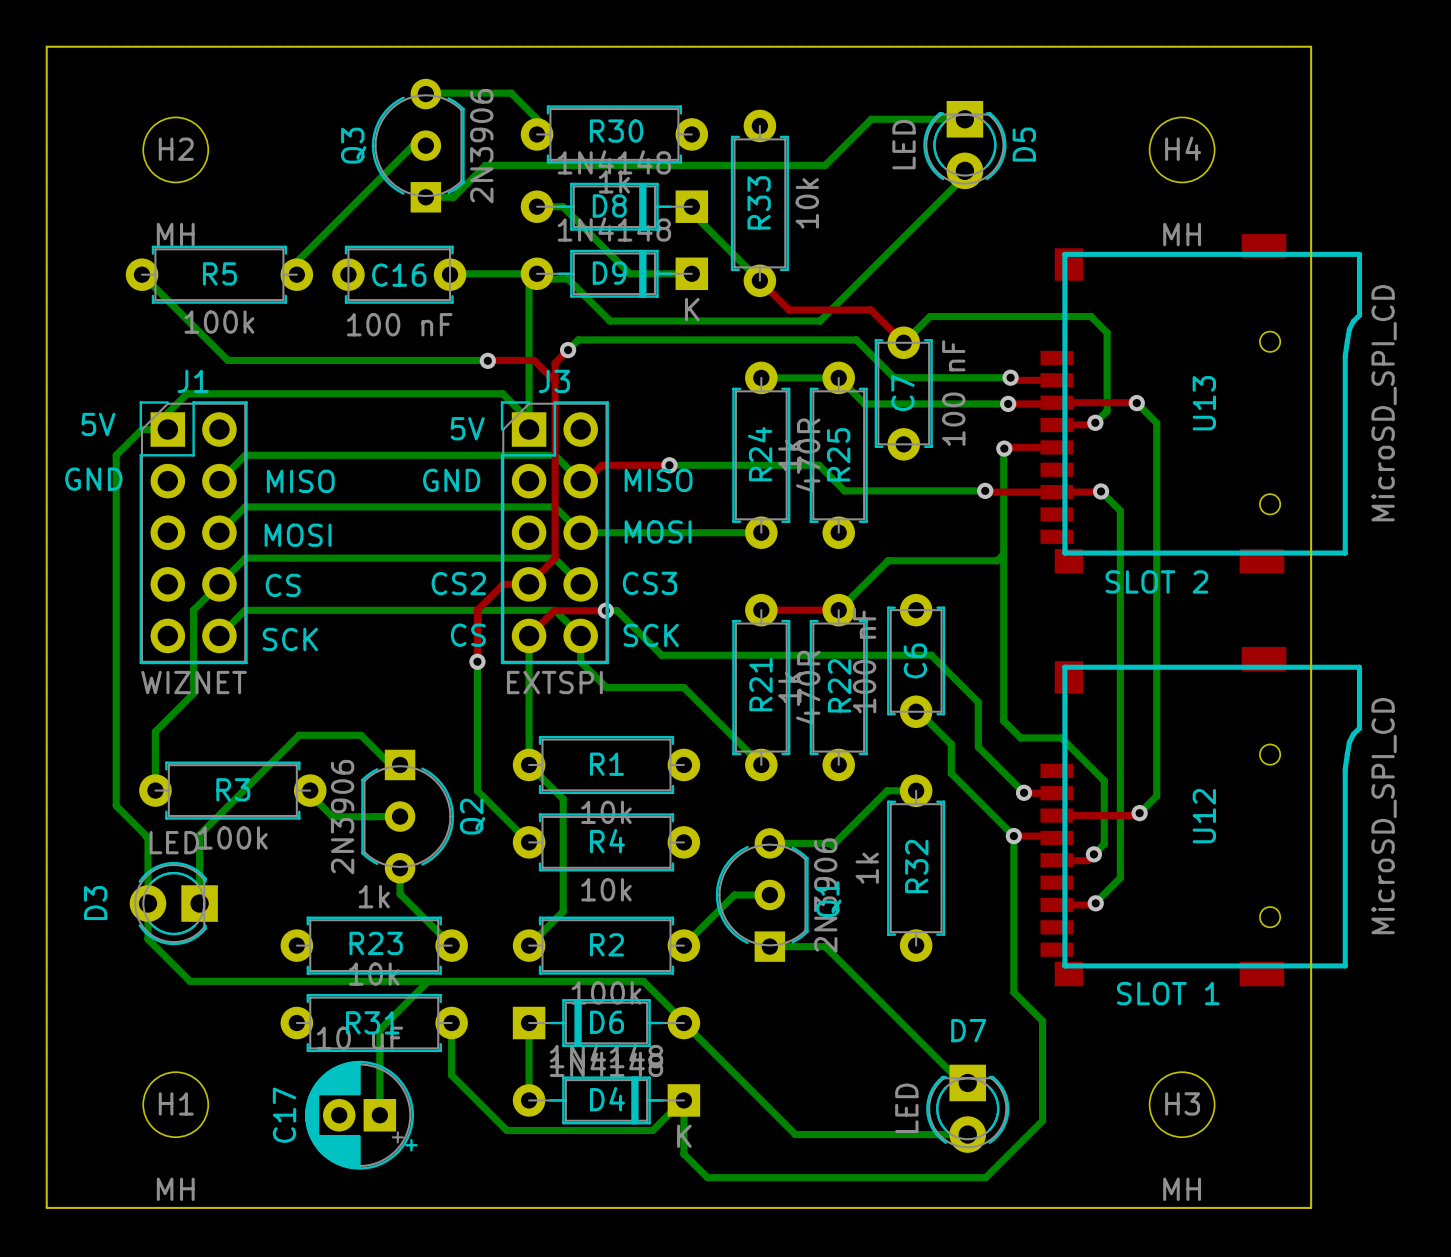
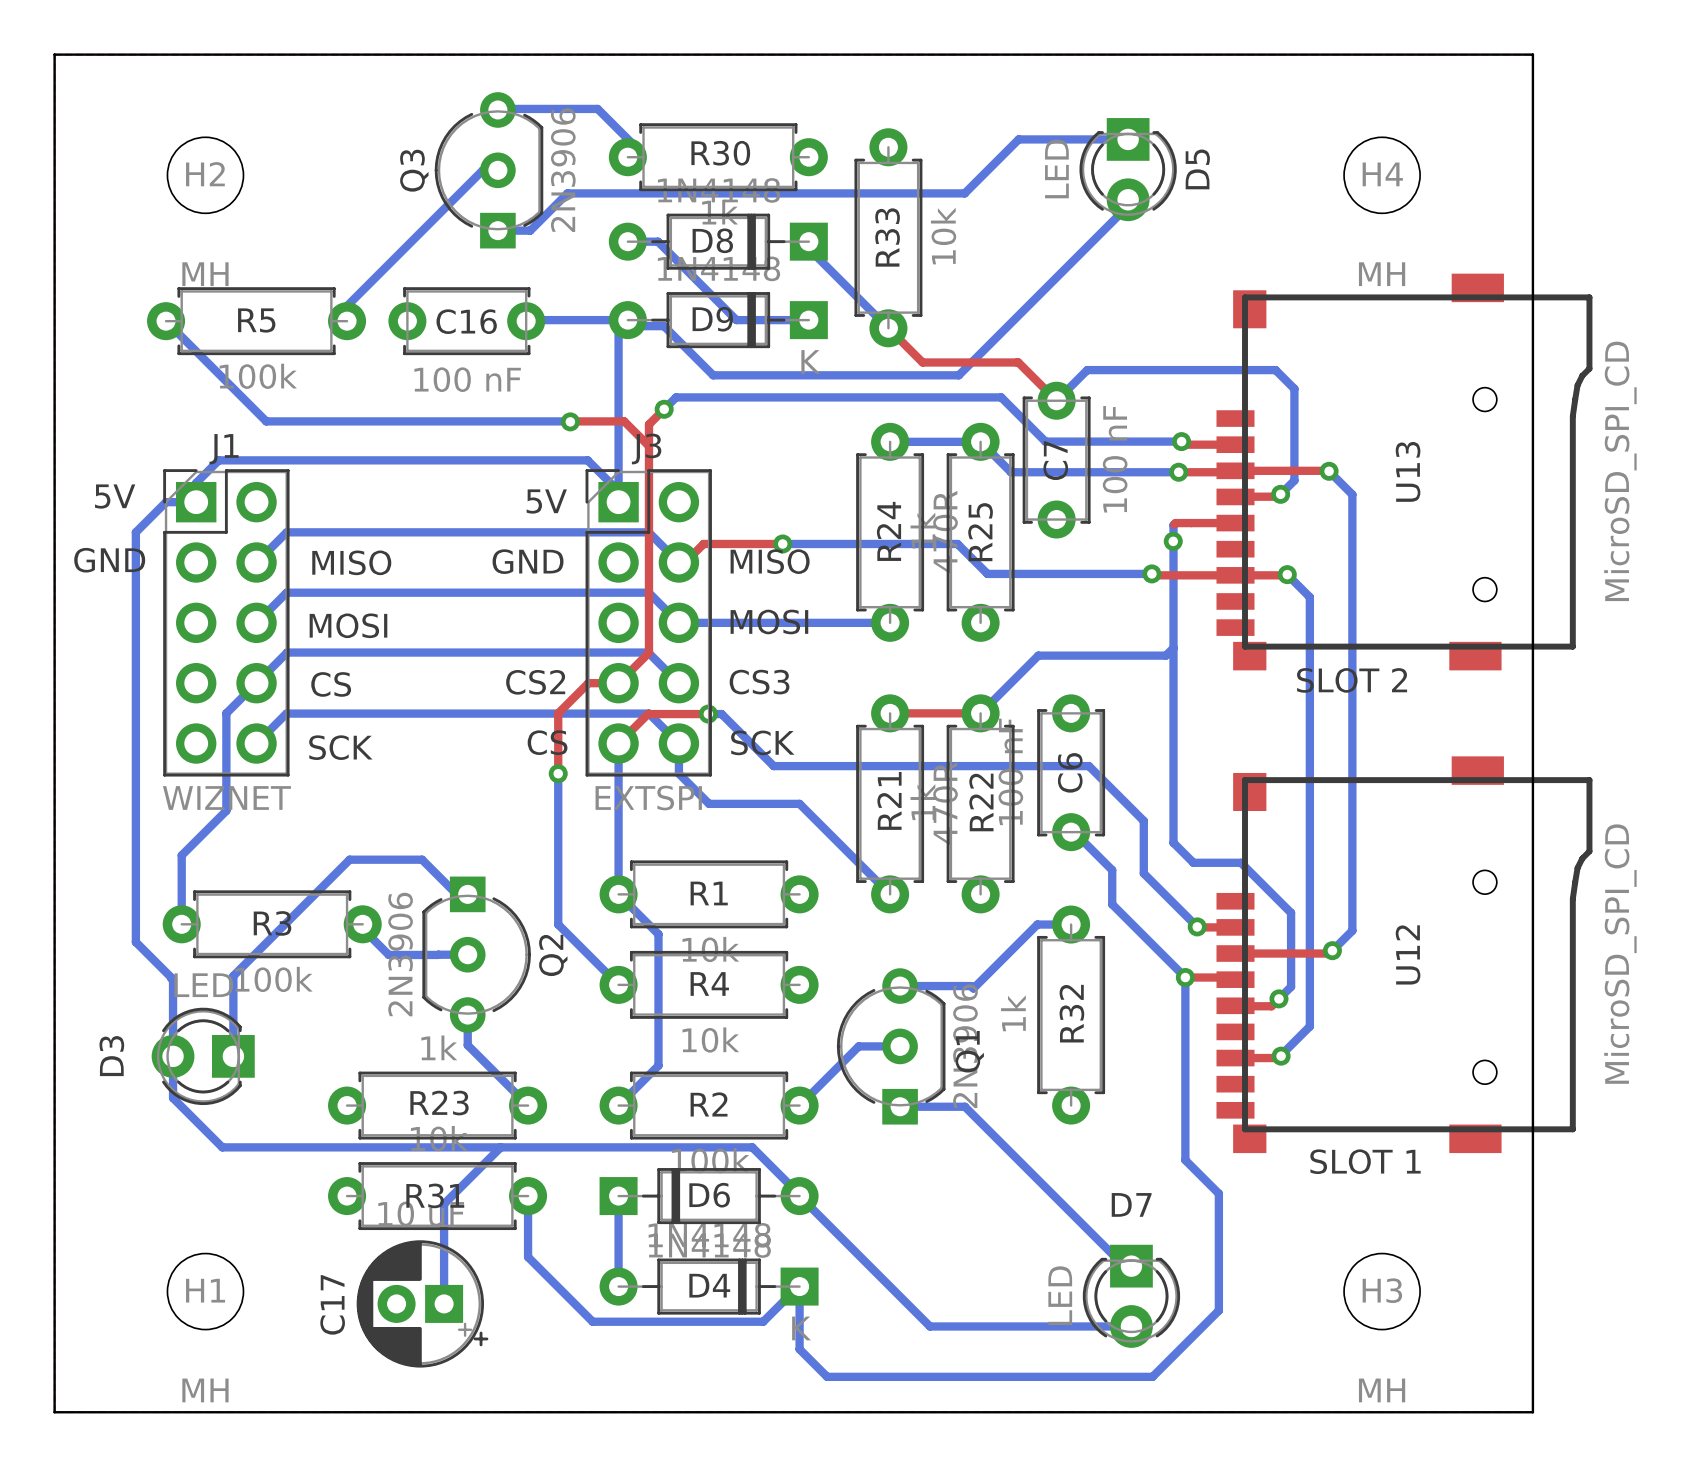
via position: (1004, 448) -> (1173, 541)

